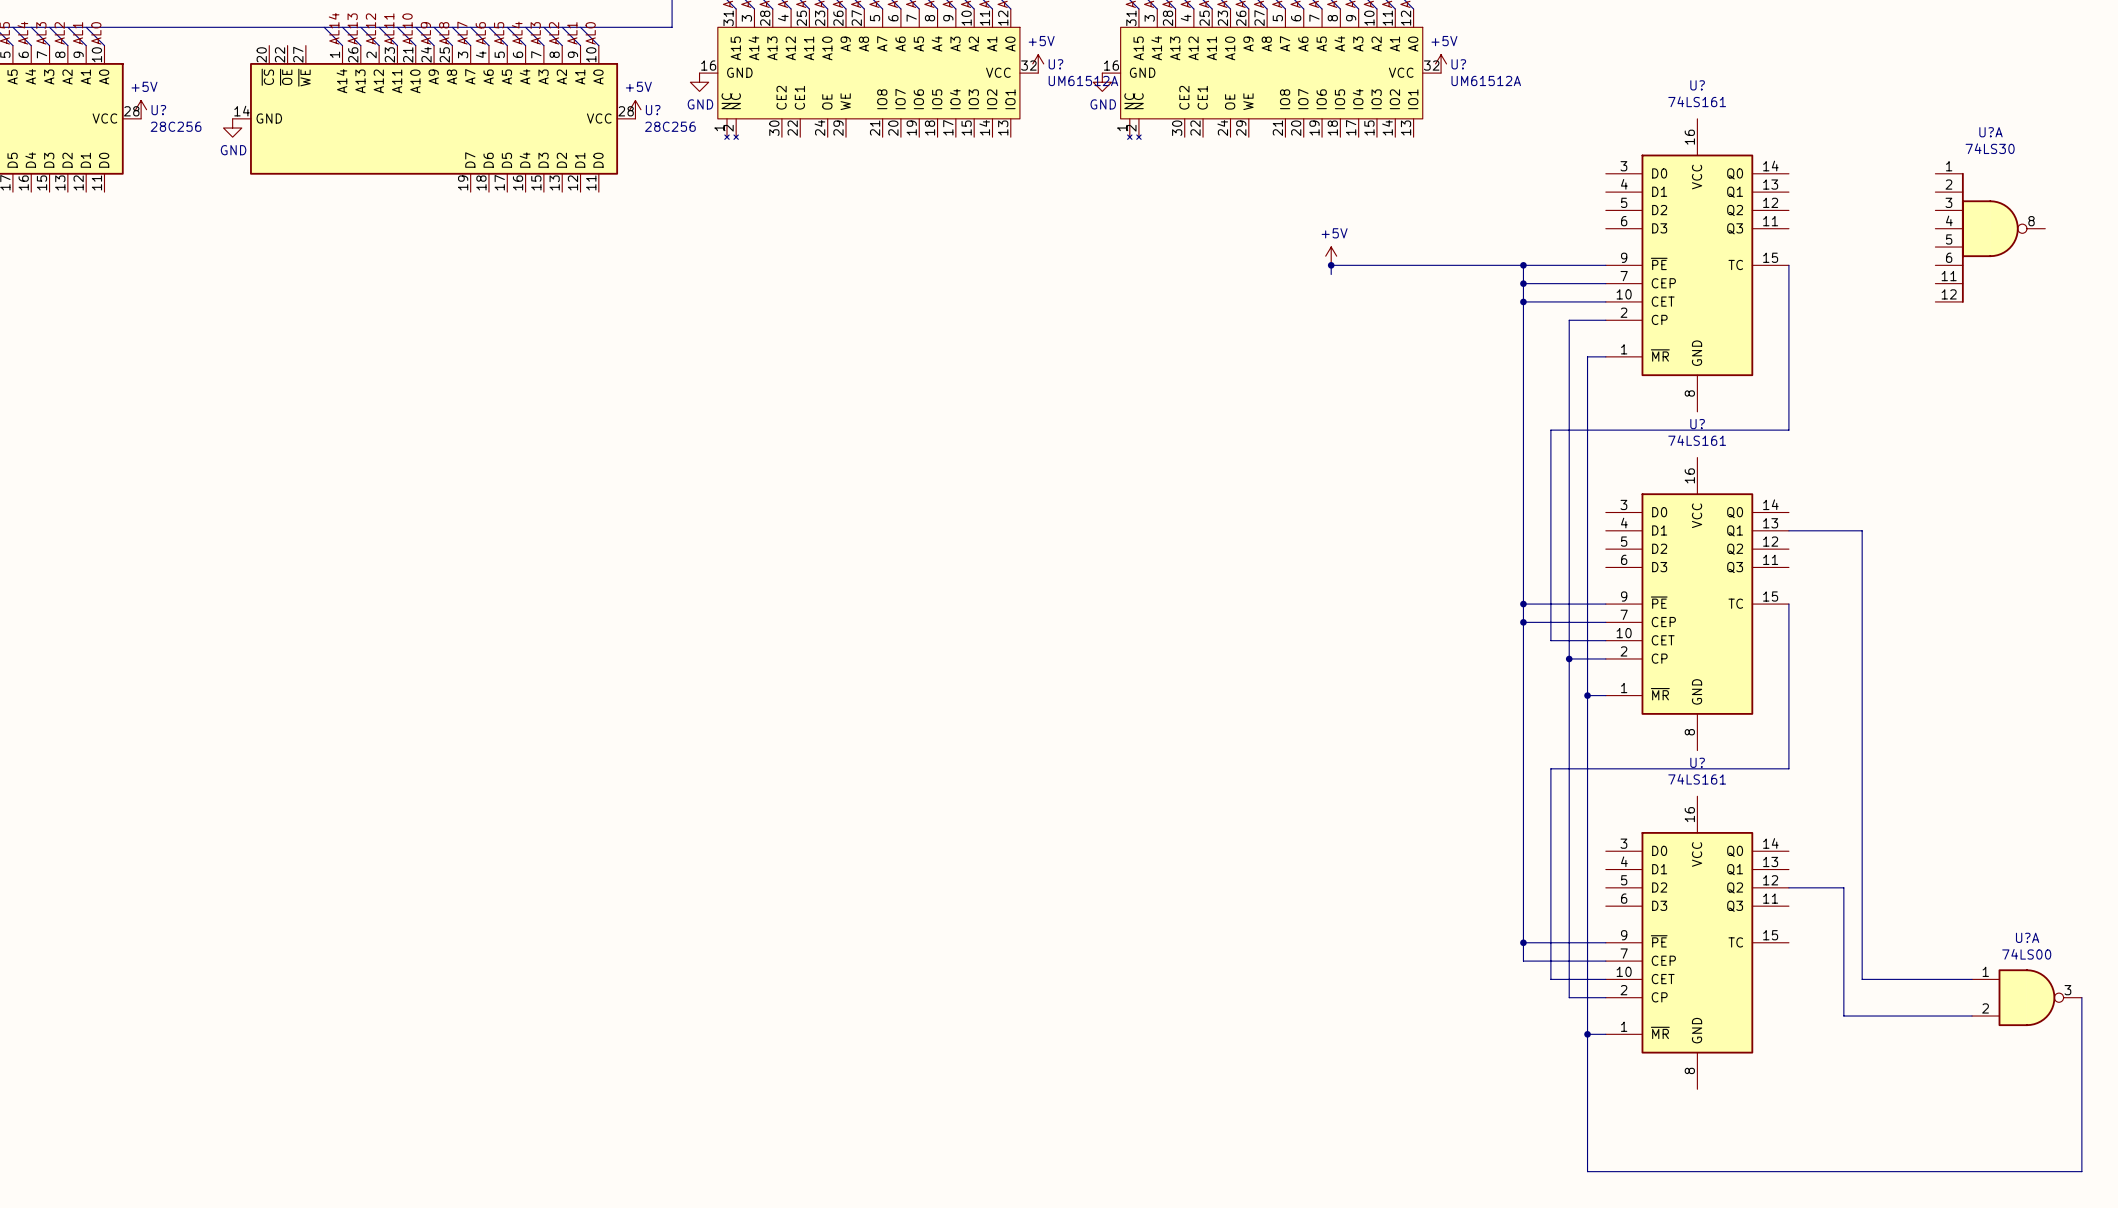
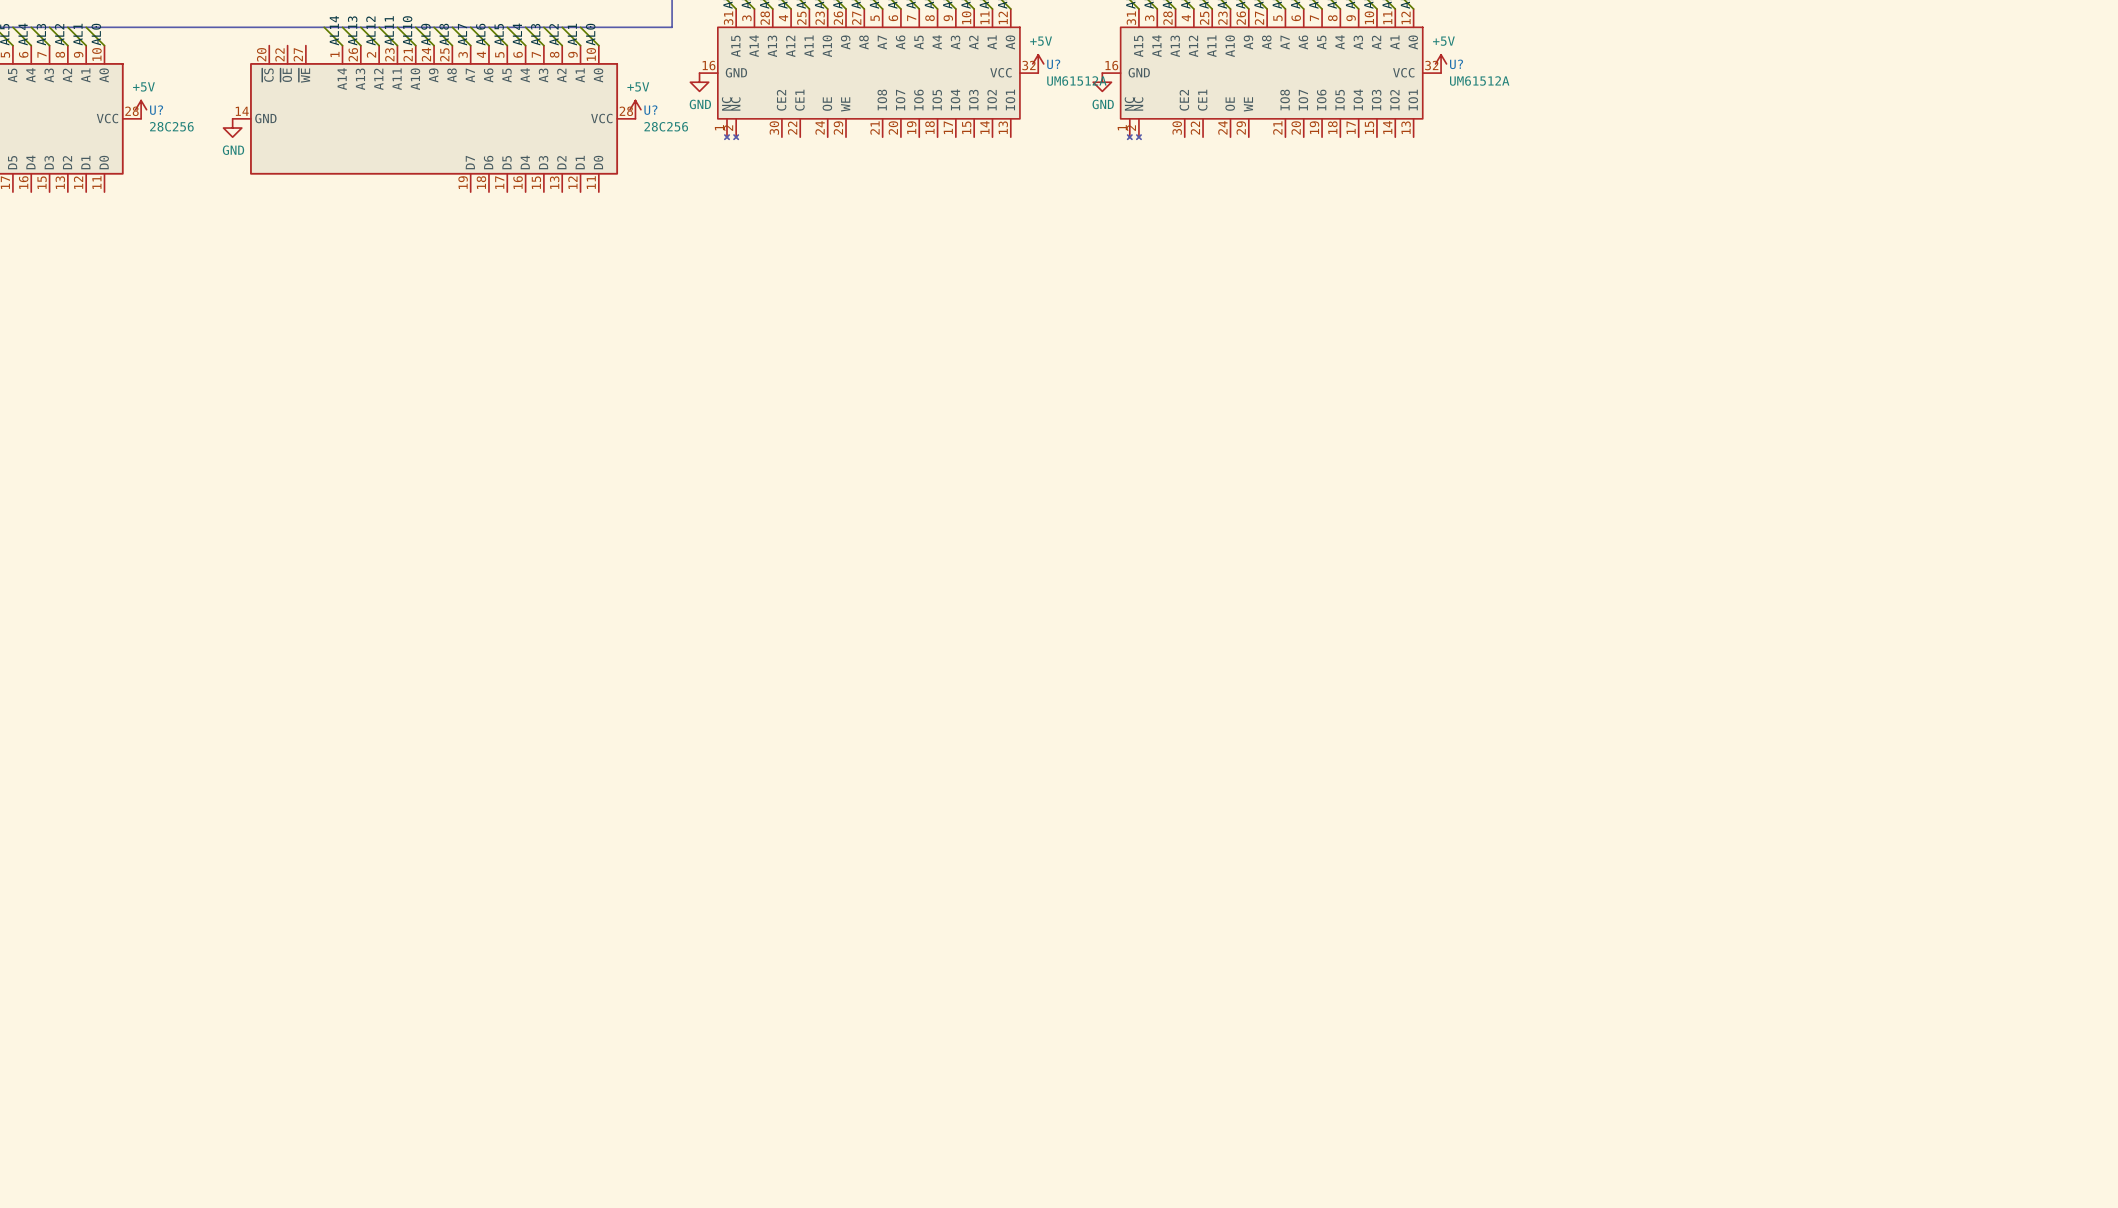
U?A: 74LS30 (1990, 237) -> none
power symbol: +5V (1331, 256) -> none
junction: (1331, 265) -> none
wire: (1523, 265) (1523, 961) (1605, 961) -> none
junction: (1523, 265) -> none
wire: (1605, 265) (1331, 265) (1331, 274) -> none
U?: 74LS161 (1697, 265) -> none
wire: (1788, 265) (1788, 430) (1550, 430) (1550, 640) (1605, 640) -> none
wire: (1523, 283) (1605, 283) -> none
junction: (1523, 283) -> none
wire: (1523, 301) (1605, 301) -> none
junction: (1523, 301) -> none
wire: (1605, 320) (1569, 320) (1569, 997) (1605, 997) -> none
wire: (1605, 356) (1587, 356) (1587, 1171) (2081, 1171) (2081, 997) -> none
wire: (1788, 530) (1862, 530) (1862, 979) (1972, 979) -> none
wire: (1523, 604) (1605, 604) -> none
junction: (1523, 604) -> none
U?: 74LS161 (1697, 604) -> none
wire: (1788, 604) (1788, 768) (1550, 768) (1550, 979) (1605, 979) -> none
wire: (1523, 622) (1605, 622) -> none
junction: (1523, 622) -> none
wire: (1569, 658) (1605, 658) -> none
junction: (1569, 658) -> none
wire: (1587, 695) (1605, 695) -> none
junction: (1587, 695) -> none
wire: (1788, 887) (1843, 887) (1843, 1016) (1972, 1016) -> none
wire: (1523, 942) (1605, 942) -> none
junction: (1523, 942) -> none
U?: 74LS161 (1697, 942) -> none
U?A: 74LS00 (2026, 997) -> none
wire: (1587, 1034) (1605, 1034) -> none
junction: (1587, 1034) -> none

